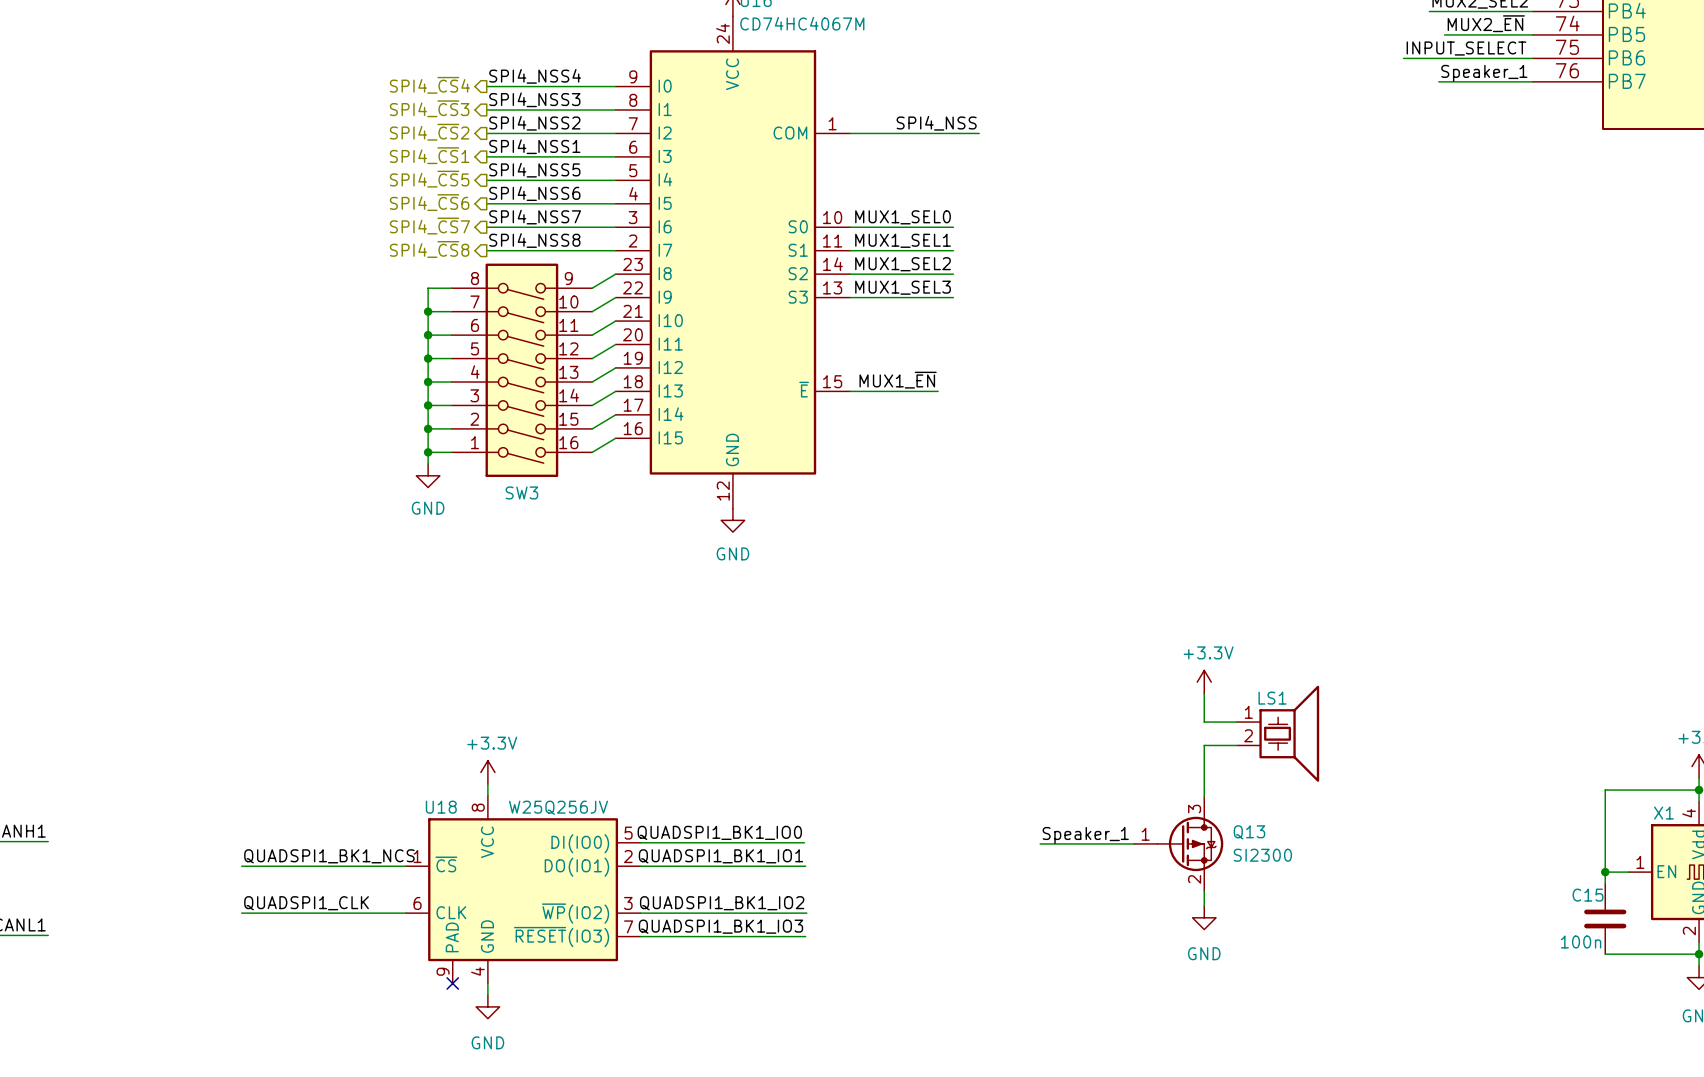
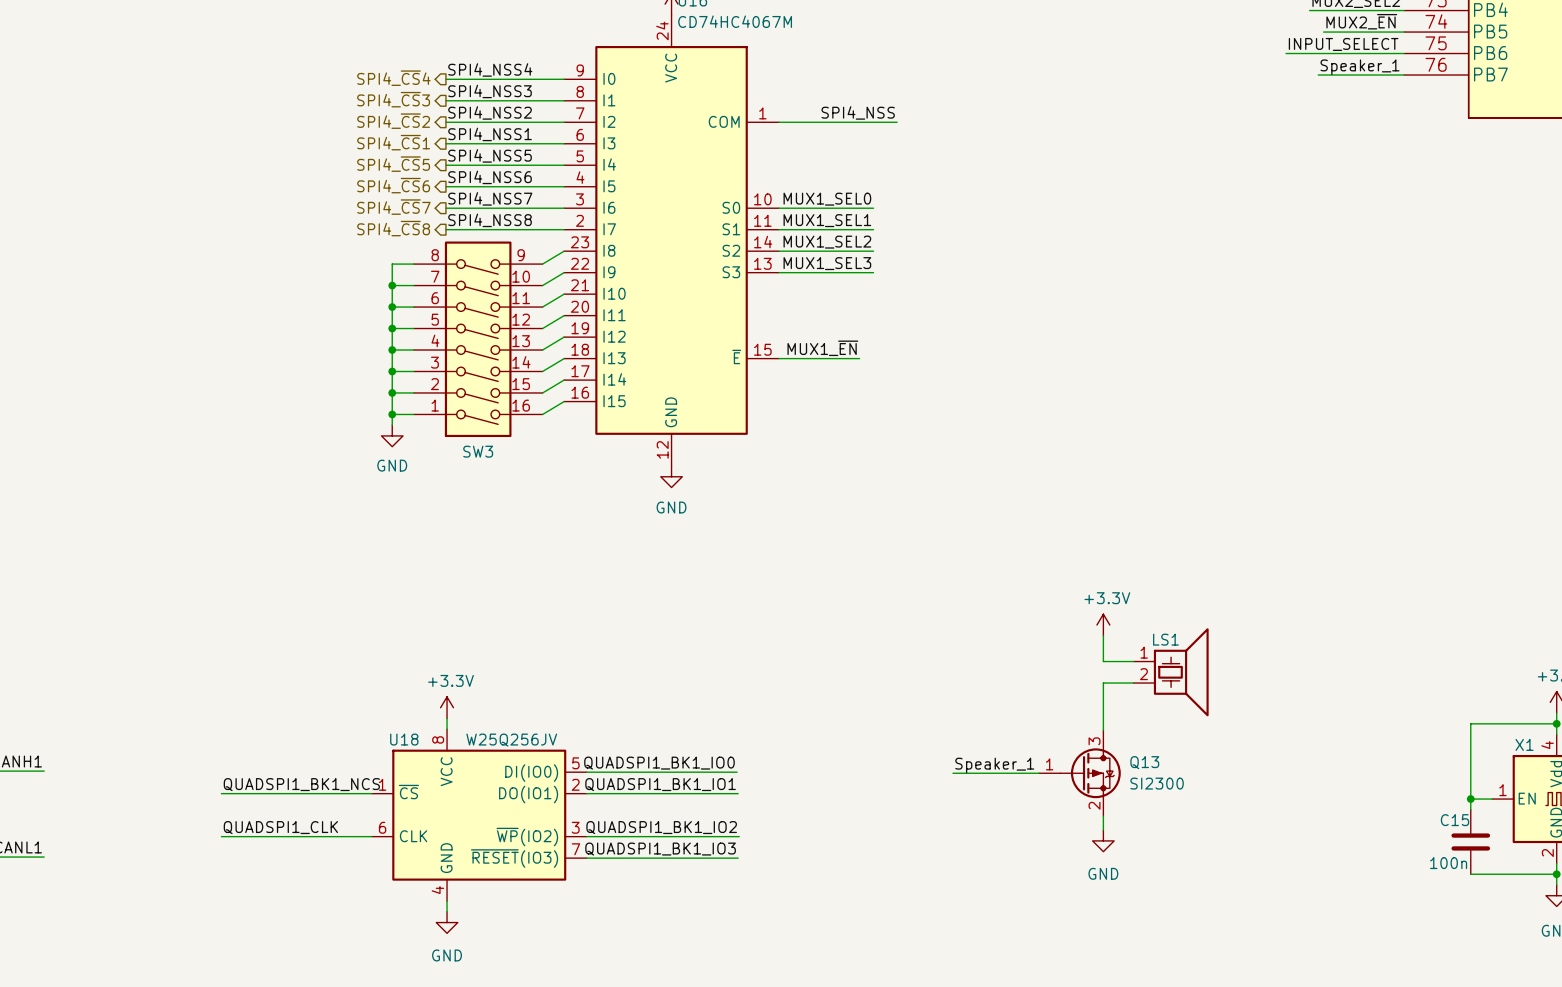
U18 symbol: [405, 795, 641, 984] -> [371, 729, 587, 902]
no-connect mark: (452, 983) -> none

